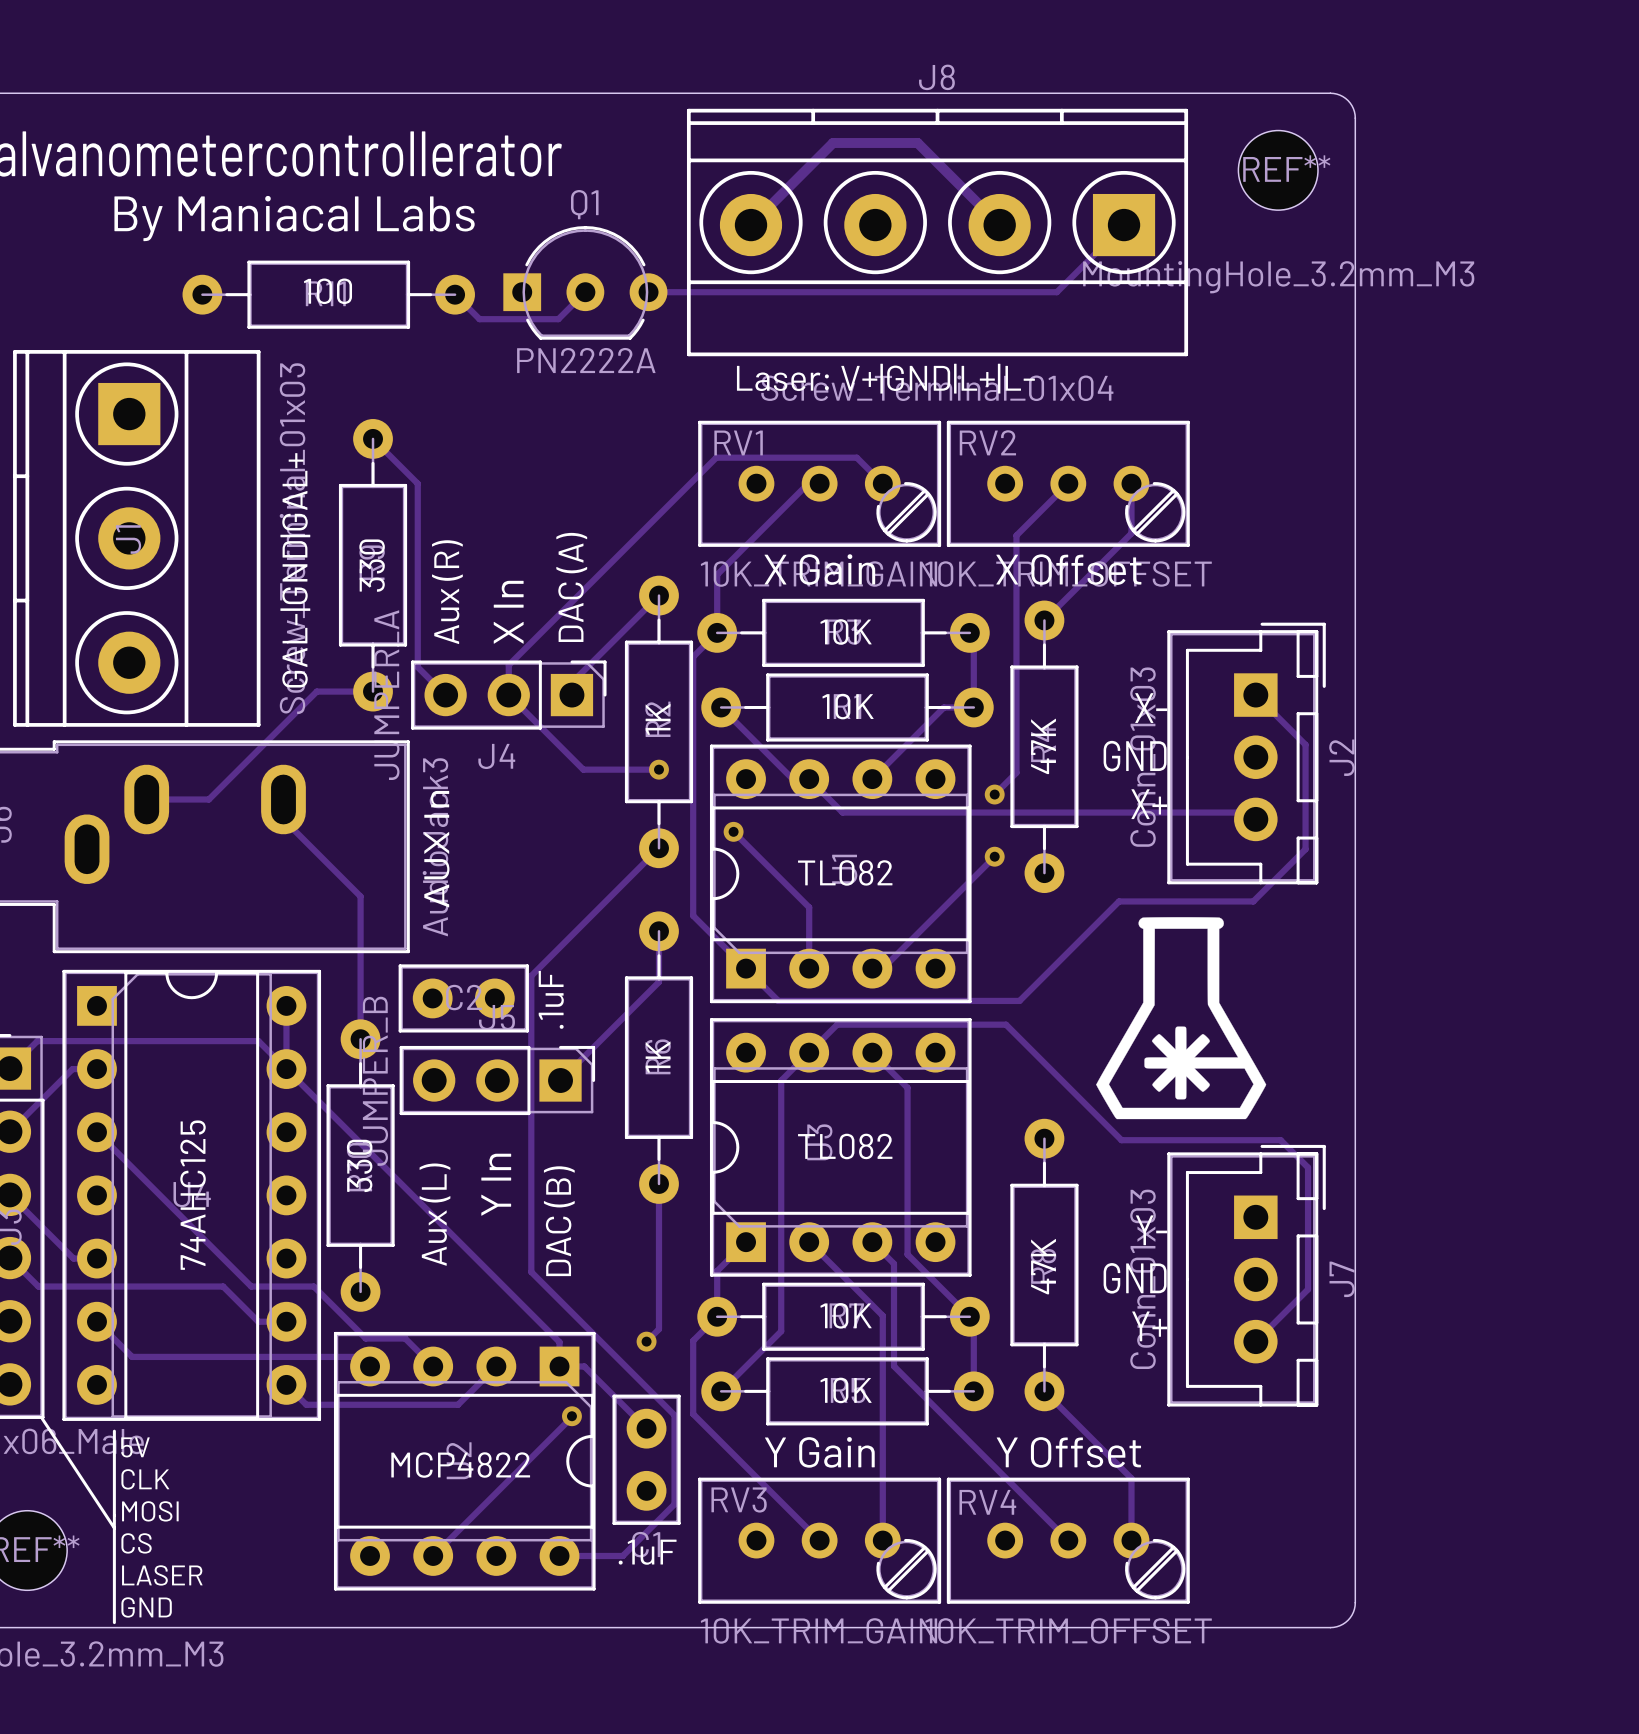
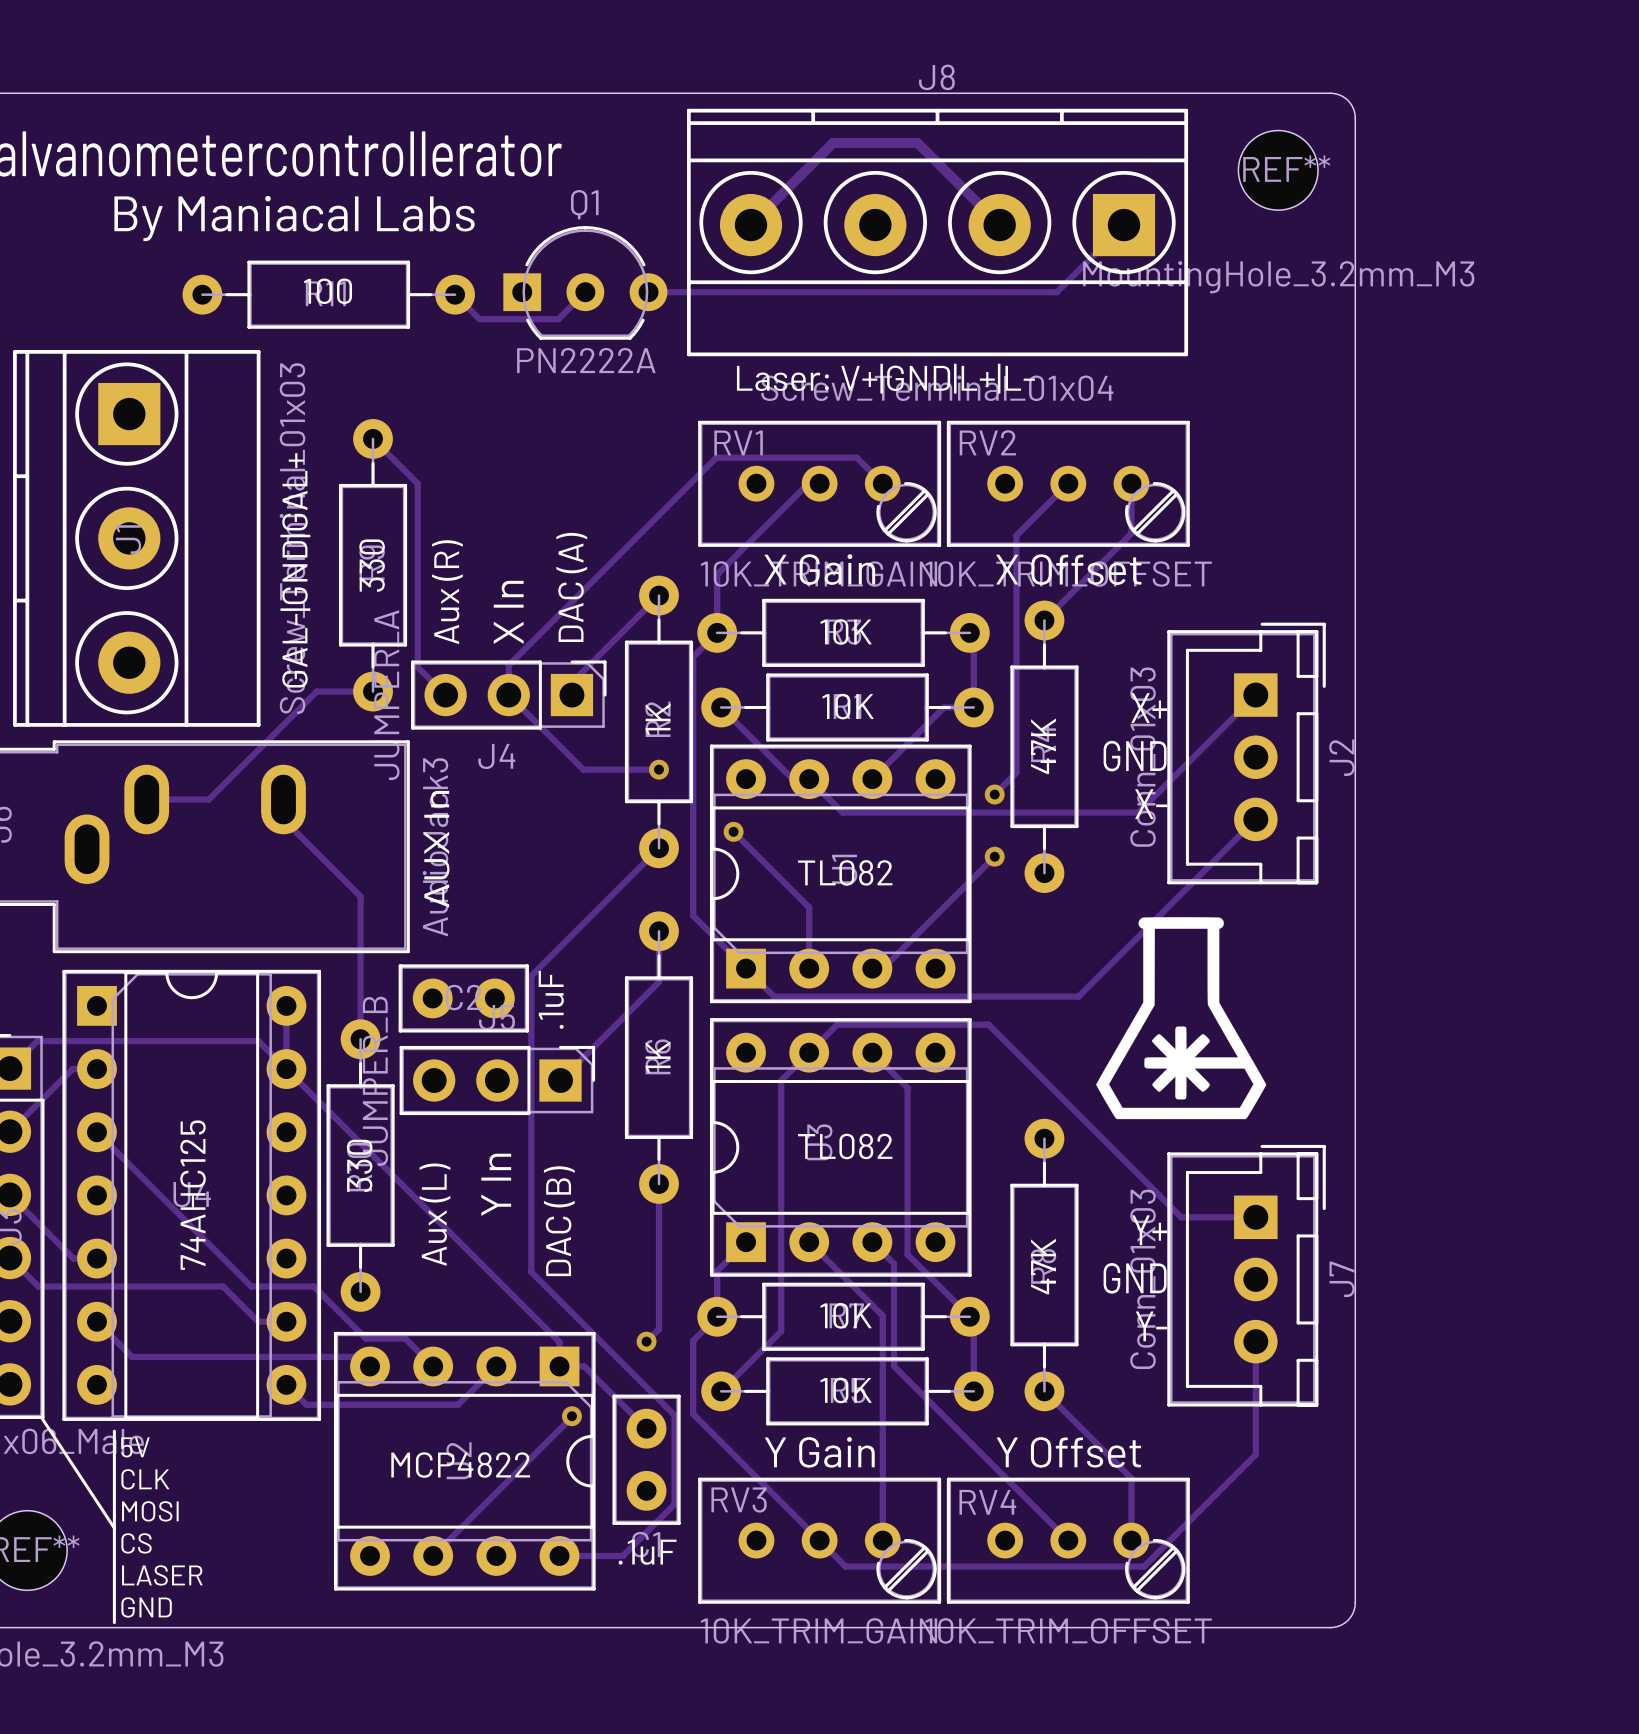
track: (1255, 695) (1305, 744) (1305, 849) (1253, 901) (1119, 901) (1019, 1000) (778, 1000) (774, 996) -> (1255, 819) (1078, 996) (774, 996)
text: X- (1151, 708) -> X+ (1149, 708)
text: X+ (1149, 804) -> X- (1151, 804)
track: (1138, 812) (1248, 812) (1255, 819) -> (1138, 812) (1255, 695)
track: (988, 1024) (1006, 1024) (1121, 1140) (1280, 1140) (1308, 1167) (1308, 1289) (1255, 1341) -> (988, 1024) (1181, 1217) (1255, 1217)
text: Y- (1151, 1230) -> Y+ (1149, 1230)
text: Y+ (1149, 1326) -> Y- (1151, 1326)
track: none -> (1255, 1341) (1255, 1454) (1143, 1566) (845, 1566) (819, 1540)

